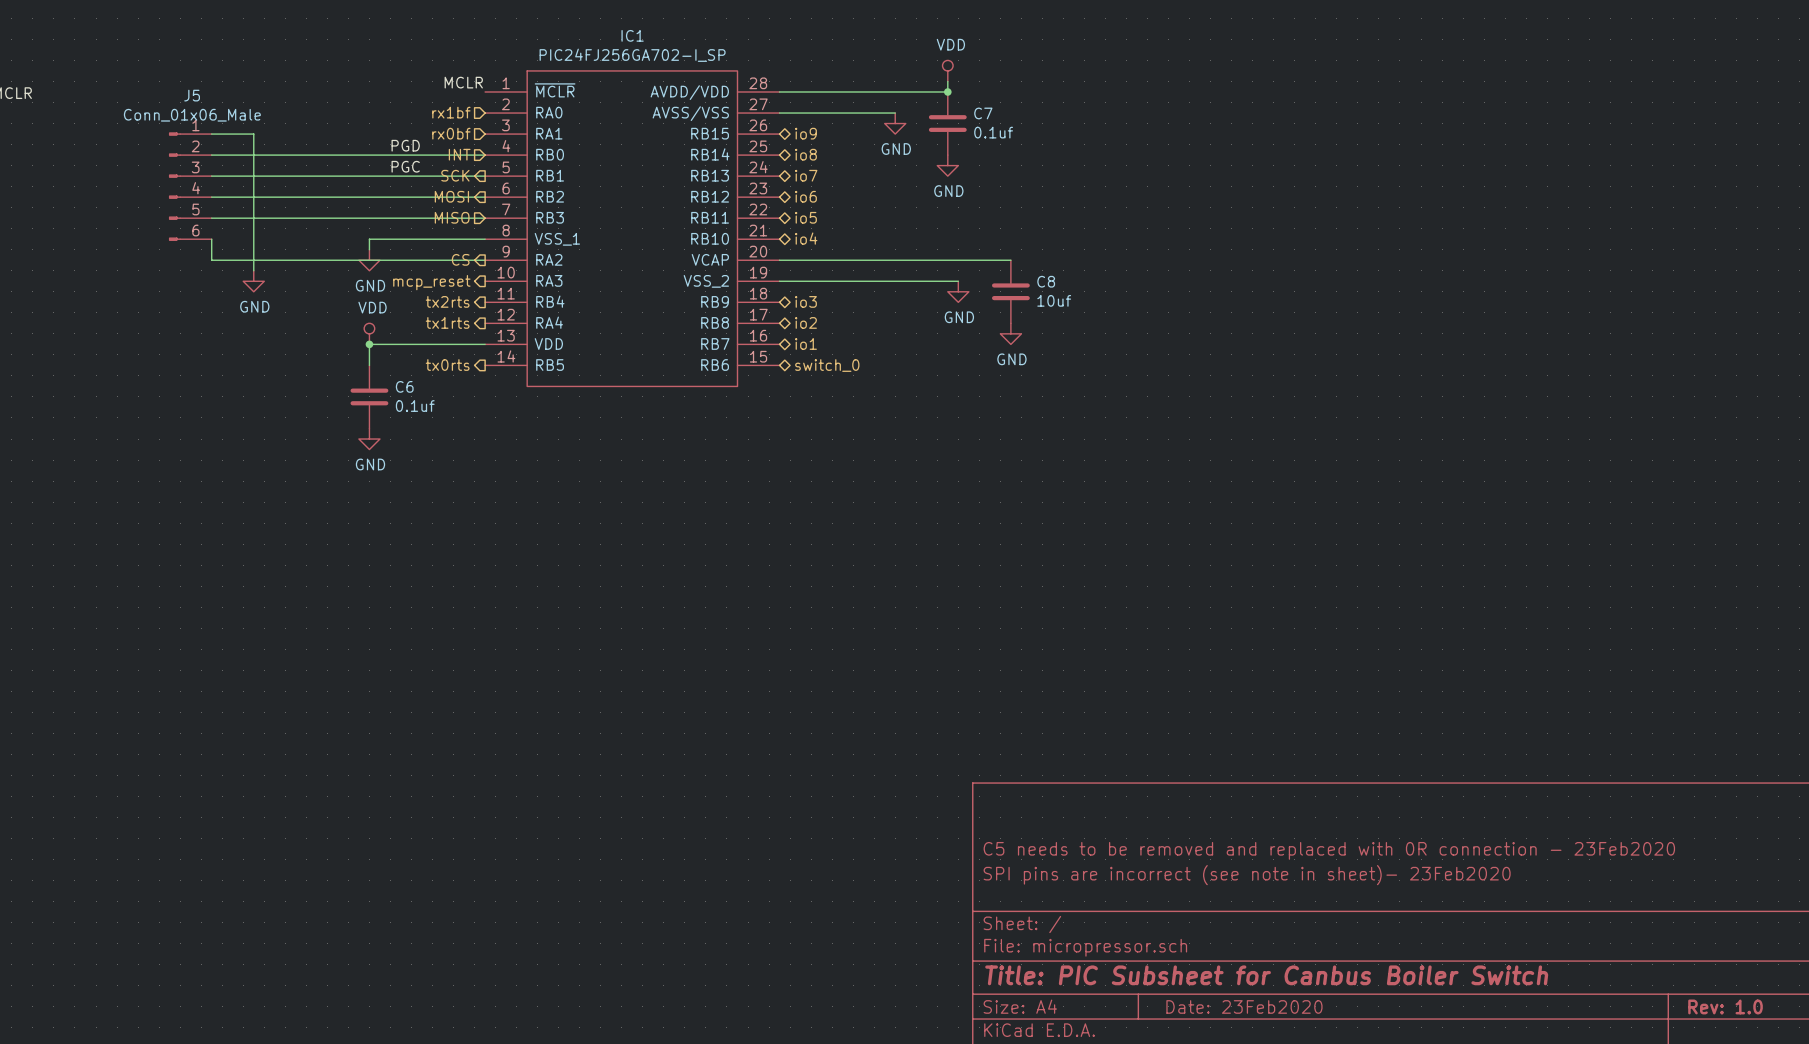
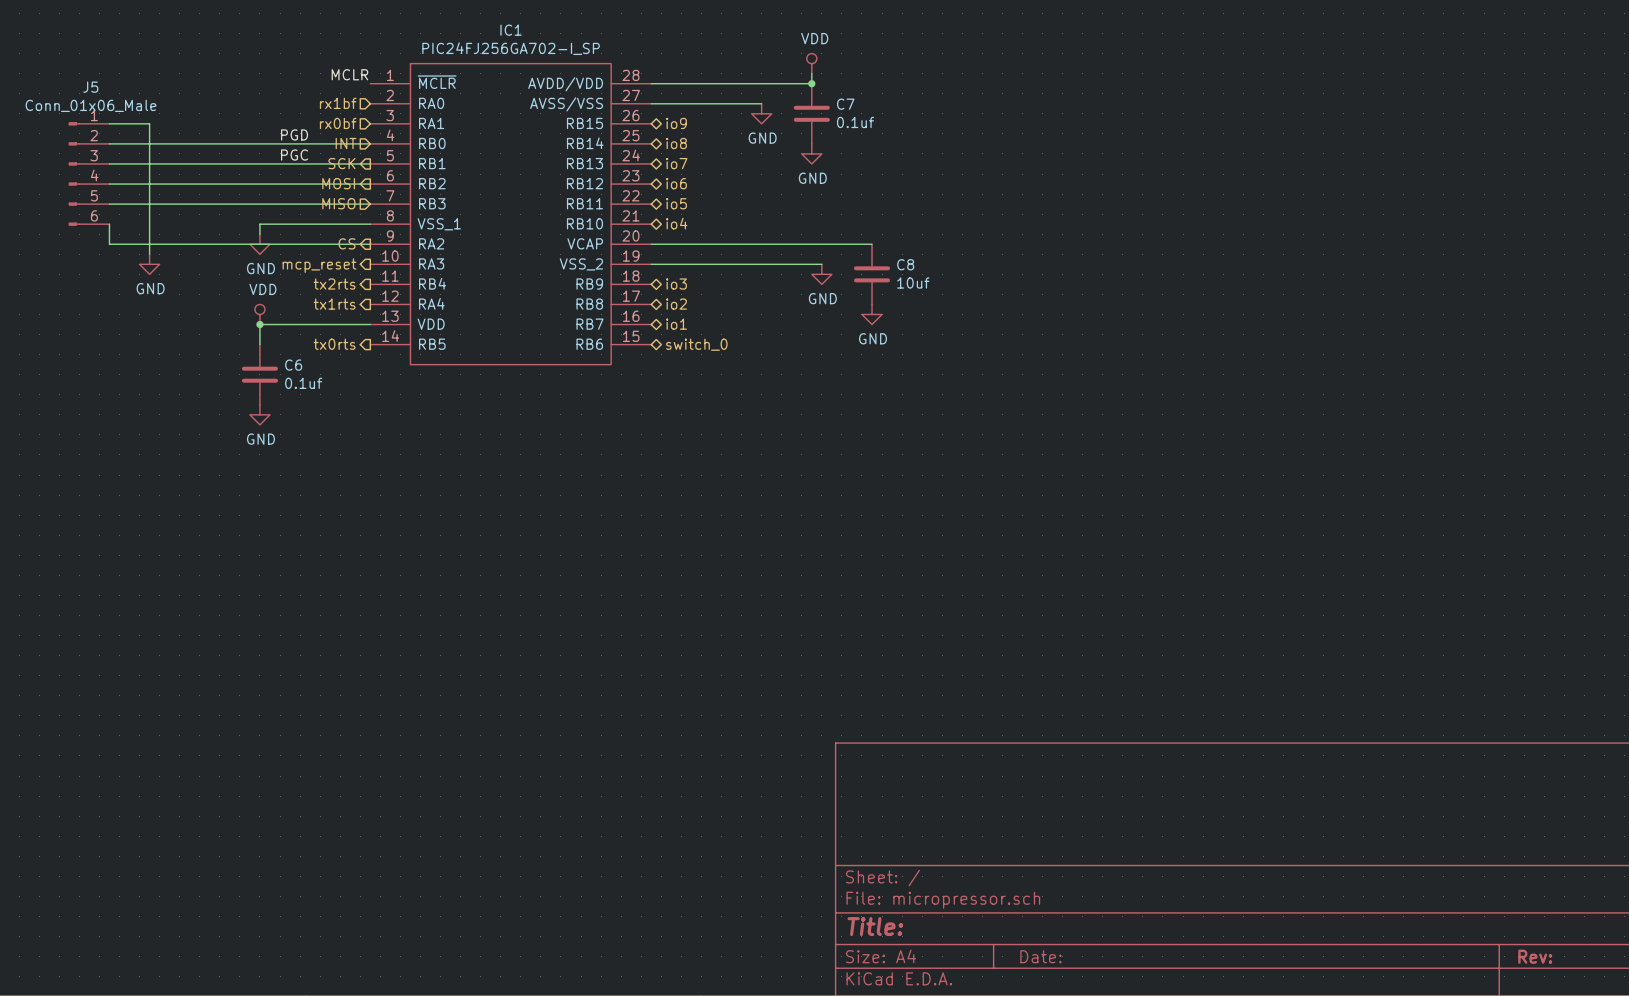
title block: C5 needs to be removed and replaced with 0R connection - 23Feb2020 (1329, 850) -> none
title block: SPI pins are incorrect (see note in sheet)- 23Feb2020 (1247, 875) -> none
title block: Title: PIC Subsheet for Canbus Boiler Switch (1266, 975) -> Title: (875, 926)
title block: Date: 23Feb2020 (1244, 1006) -> Date: (1040, 956)
title block: Rev: 1.0 (1725, 1006) -> Rev: (1535, 956)

